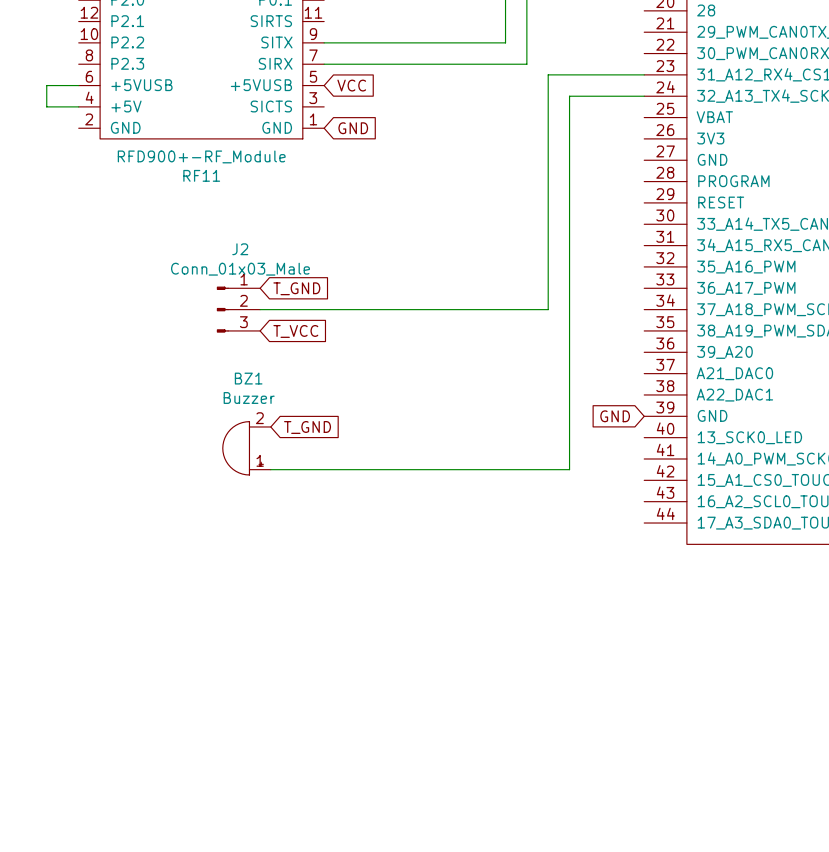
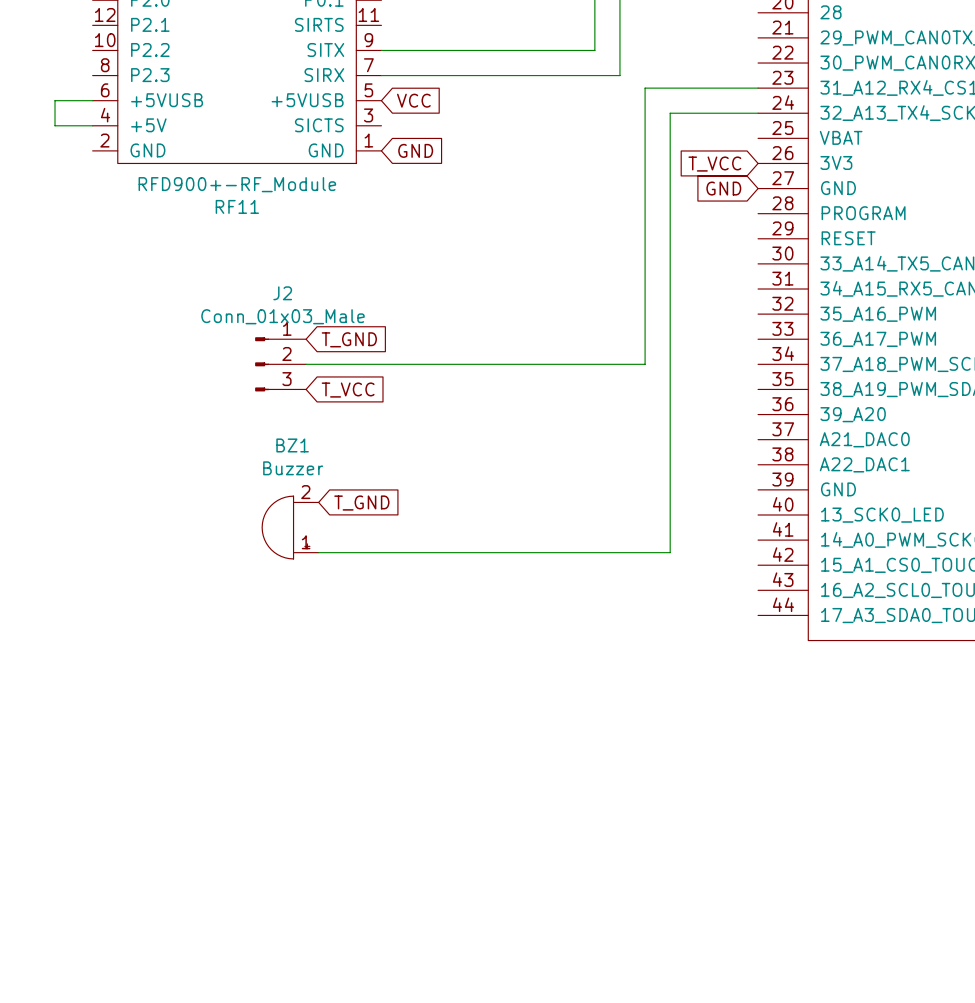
global label: none -> T_VCC (714, 164)
global label: none -> GND (723, 188)
global label: GND (615, 416) -> none

